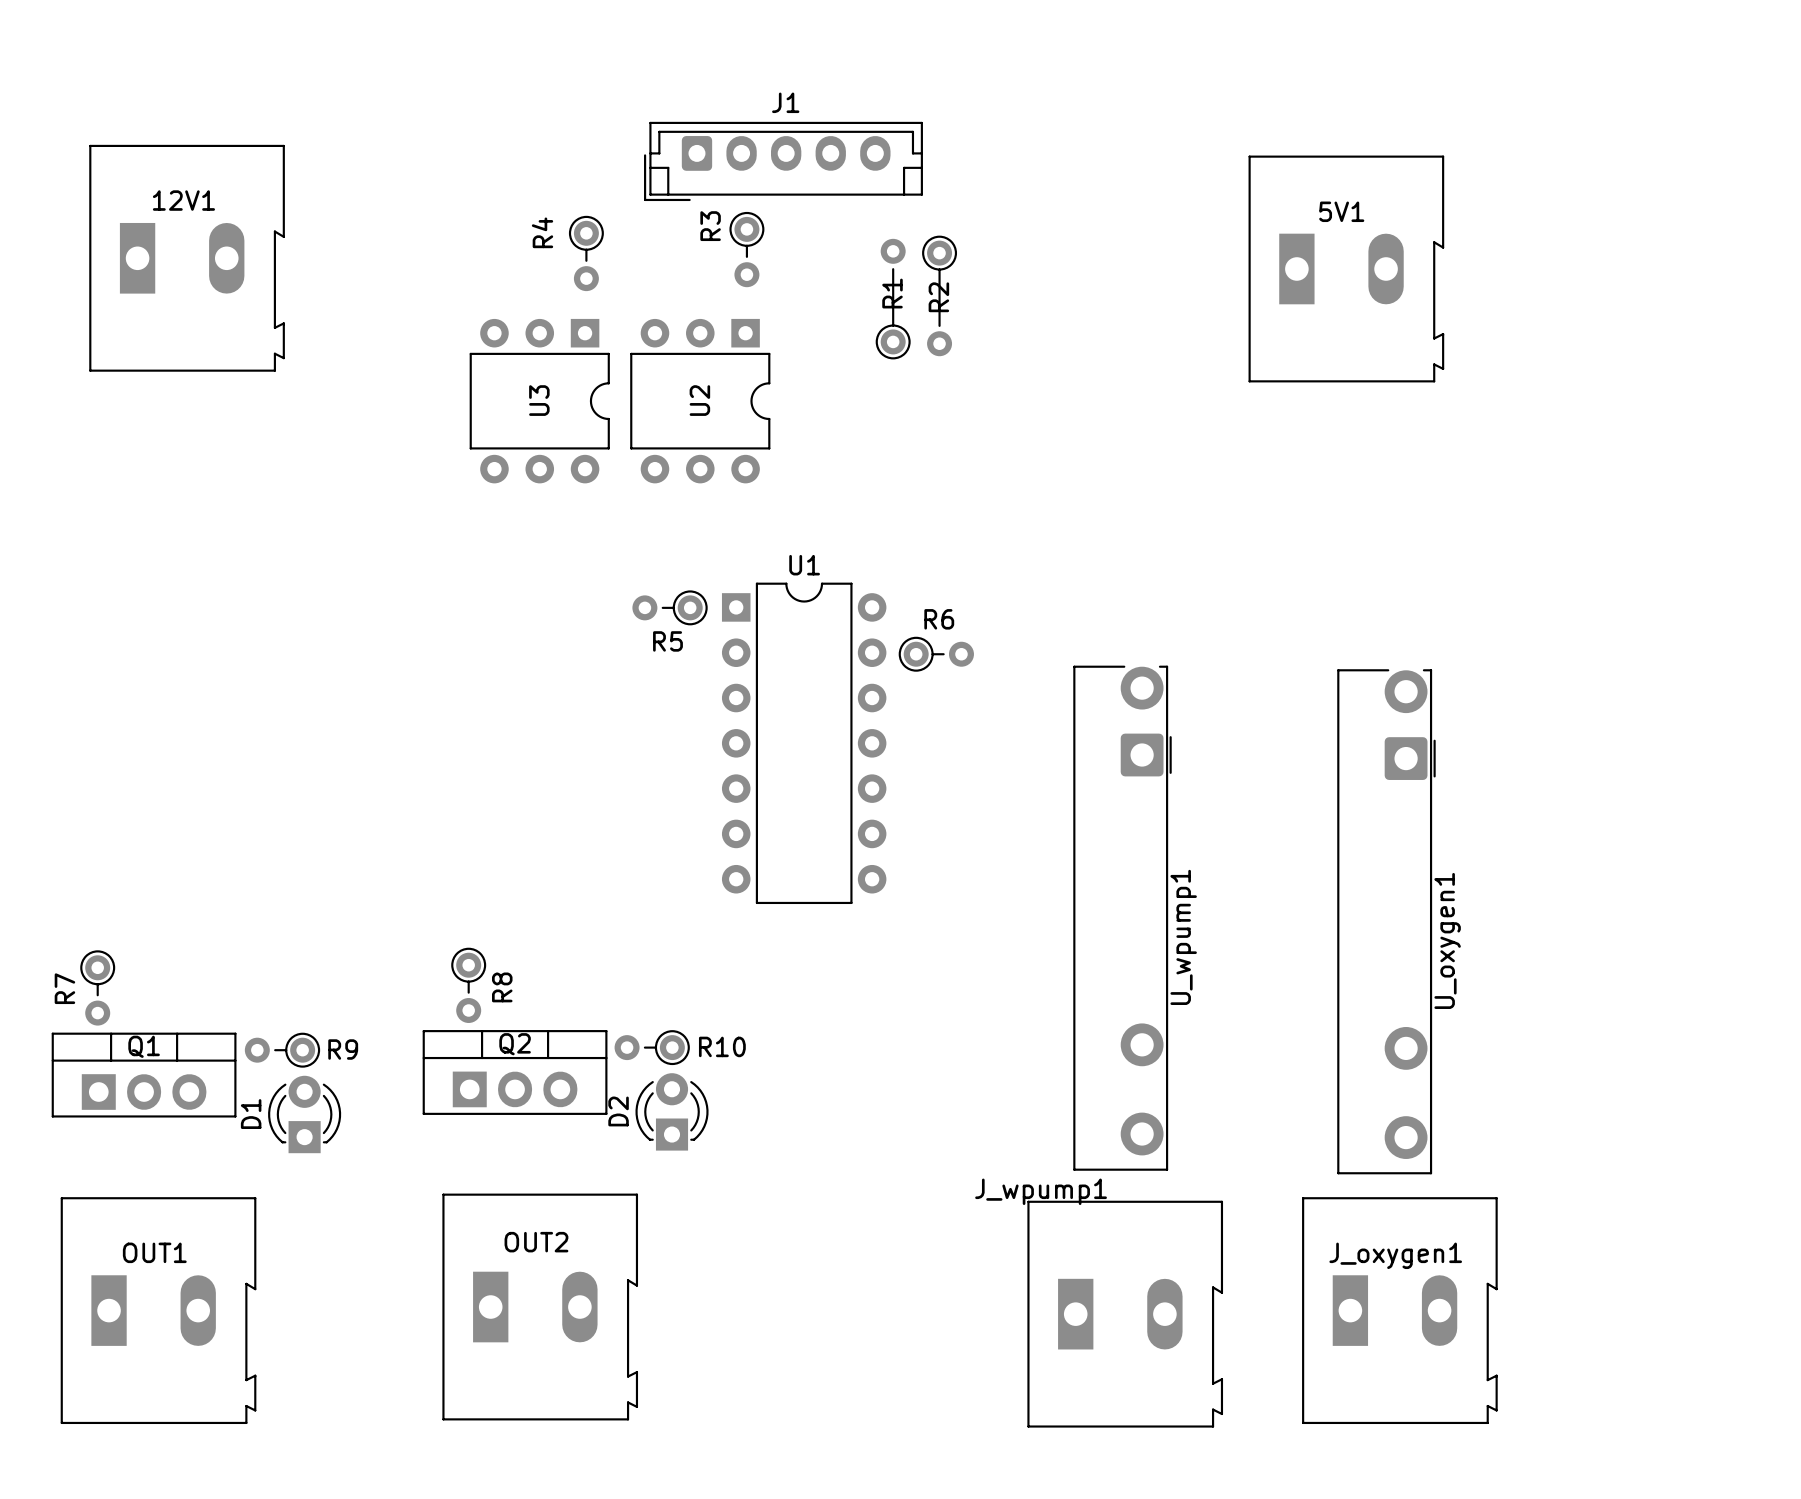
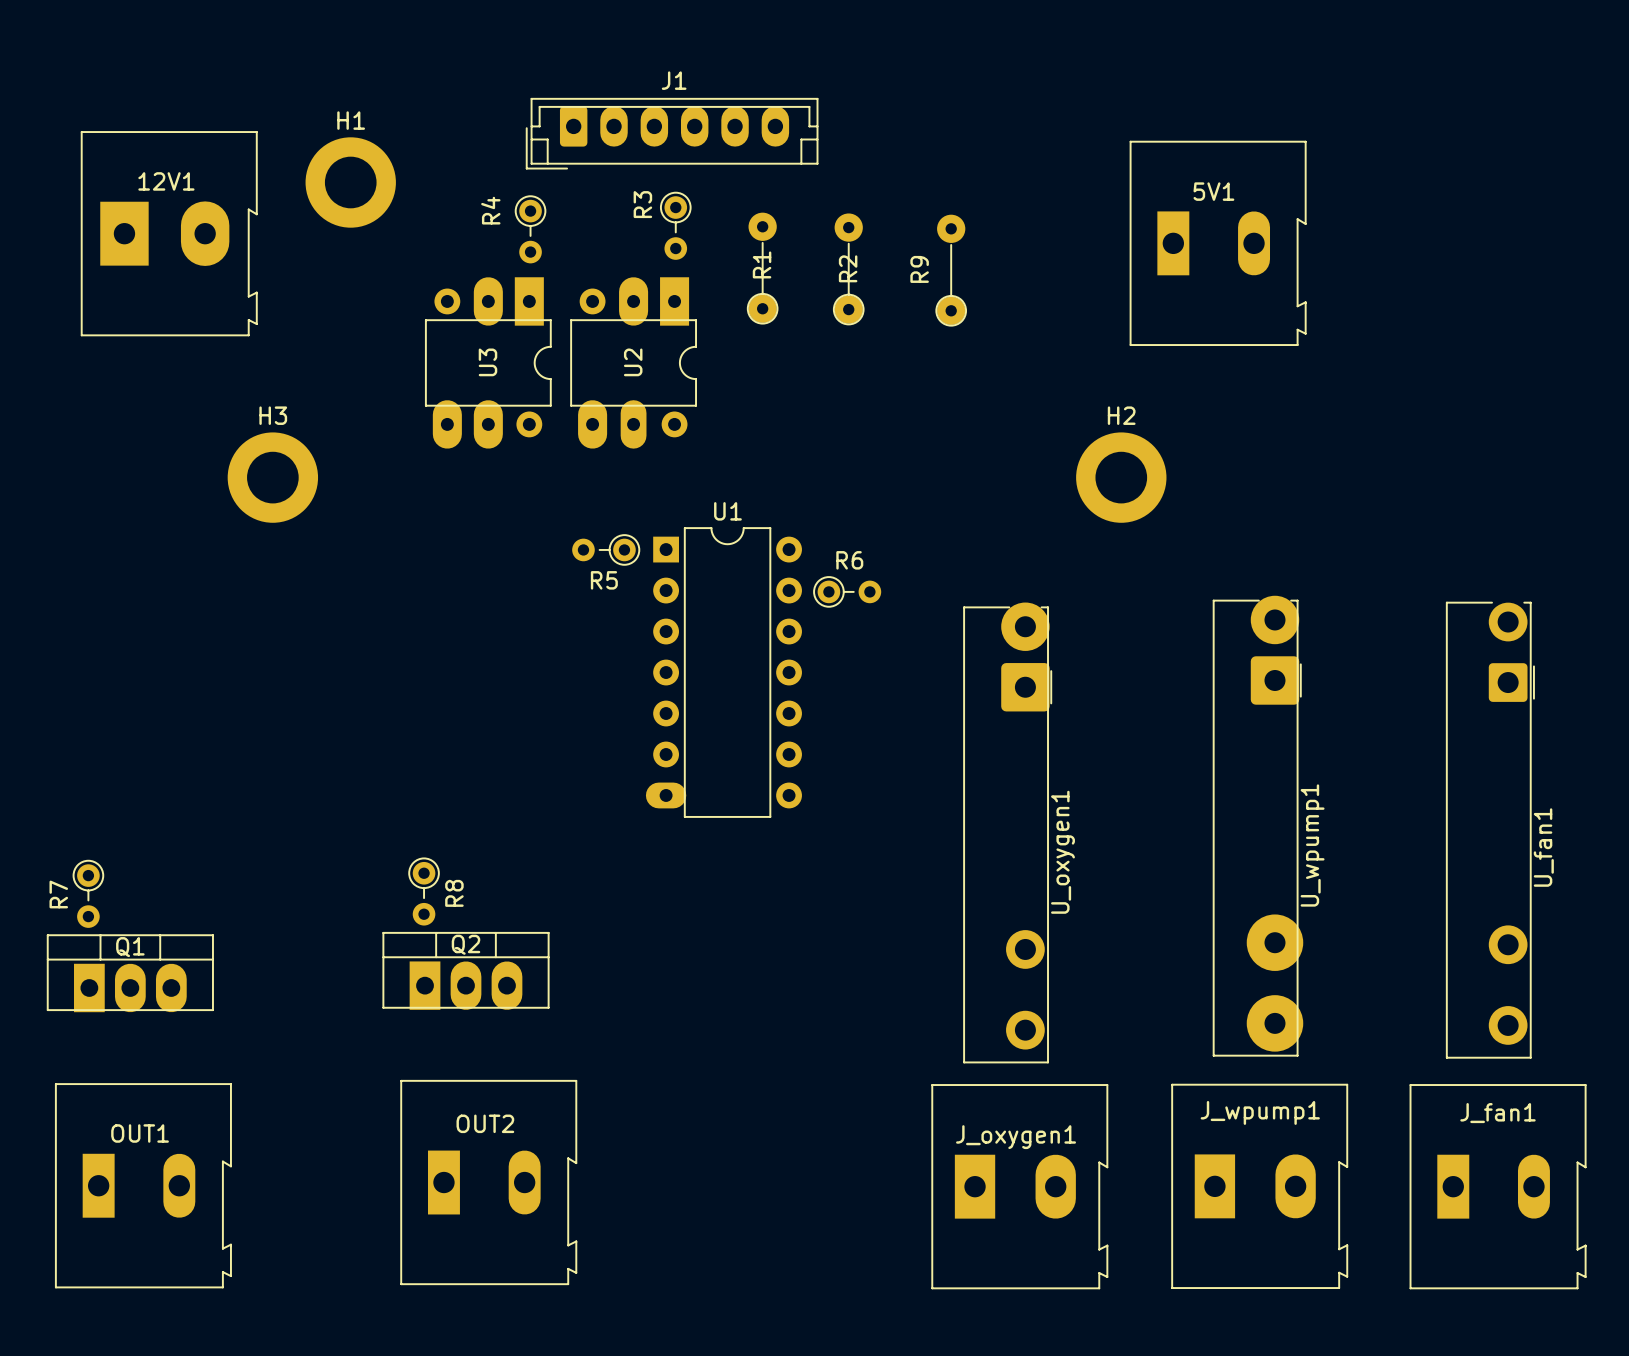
J1 footprint: [644, 121, 923, 202] -> [525, 97, 819, 170]
12V1 footprint: [89, 144, 285, 372] -> [80, 131, 258, 337]
H1: none -> (350, 182)
R2 footprint: [922, 235, 958, 357] -> [832, 213, 865, 326]
R1 footprint: [875, 238, 911, 360] -> [746, 212, 779, 325]
U3 footprint: [469, 318, 610, 484] -> [424, 277, 552, 449]
U2 footprint: [630, 318, 771, 484] -> [570, 277, 697, 449]
H3: none -> (272, 477)
H2: none -> (1121, 477)
U1 footprint: [721, 582, 887, 905] -> [645, 527, 802, 818]
U_wpump1 footprint: [1073, 665, 1172, 1171] -> [1212, 595, 1304, 1057]
U_oxygen1 footprint: [1337, 669, 1436, 1175] -> [963, 602, 1053, 1064]
U_fan1: none -> (1490, 830)
Q2 footprint: [422, 1030, 608, 1115] -> [382, 931, 550, 1010]
Q1 footprint: [51, 1032, 237, 1118] -> [46, 934, 214, 1013]
R9 footprint: [244, 1032, 321, 1068] -> [935, 214, 968, 327]
R10: (652, 1047) -> none
R9 name position: R9 (343, 1049) -> R9 (919, 269)
D2: (672, 1111) -> none
D1: (304, 1114) -> none
J_wpump1 name position: J_wpump1 (1041, 1191) -> J_wpump1 (1260, 1112)
J_oxygen1 footprint: [1302, 1197, 1498, 1425] -> [931, 1084, 1109, 1290]
J_wpump1 footprint: [1027, 1200, 1224, 1428] -> [1171, 1083, 1349, 1290]
J_fan1: none -> (1498, 1186)

